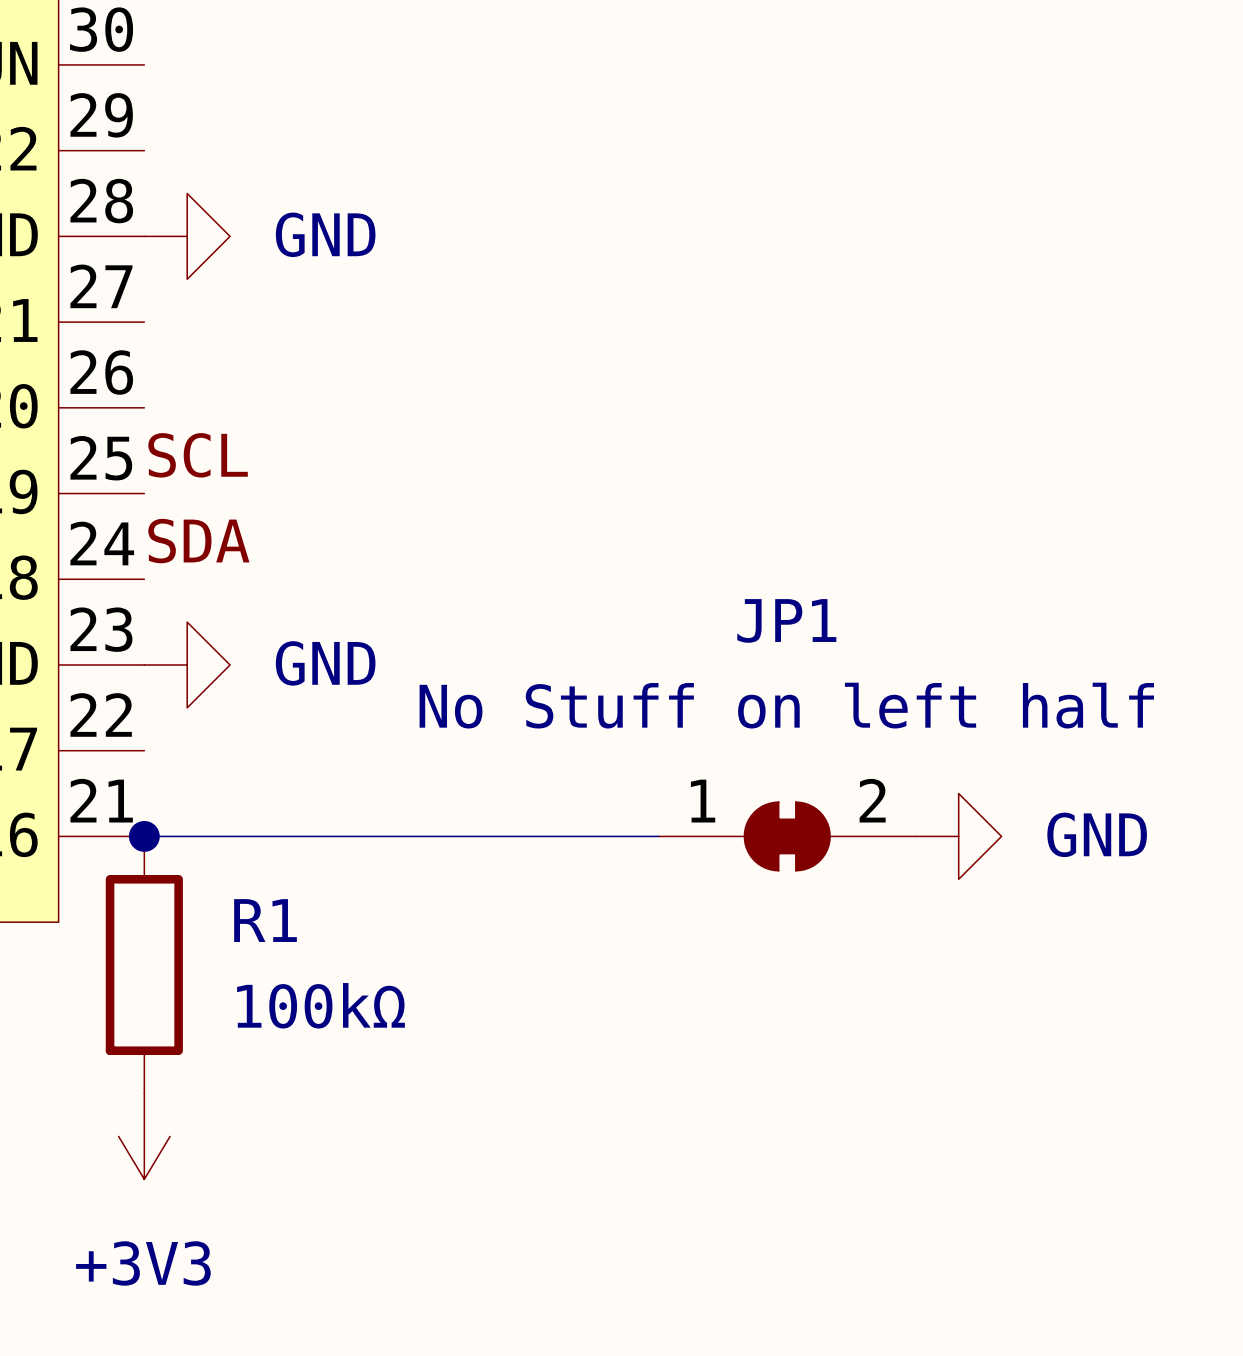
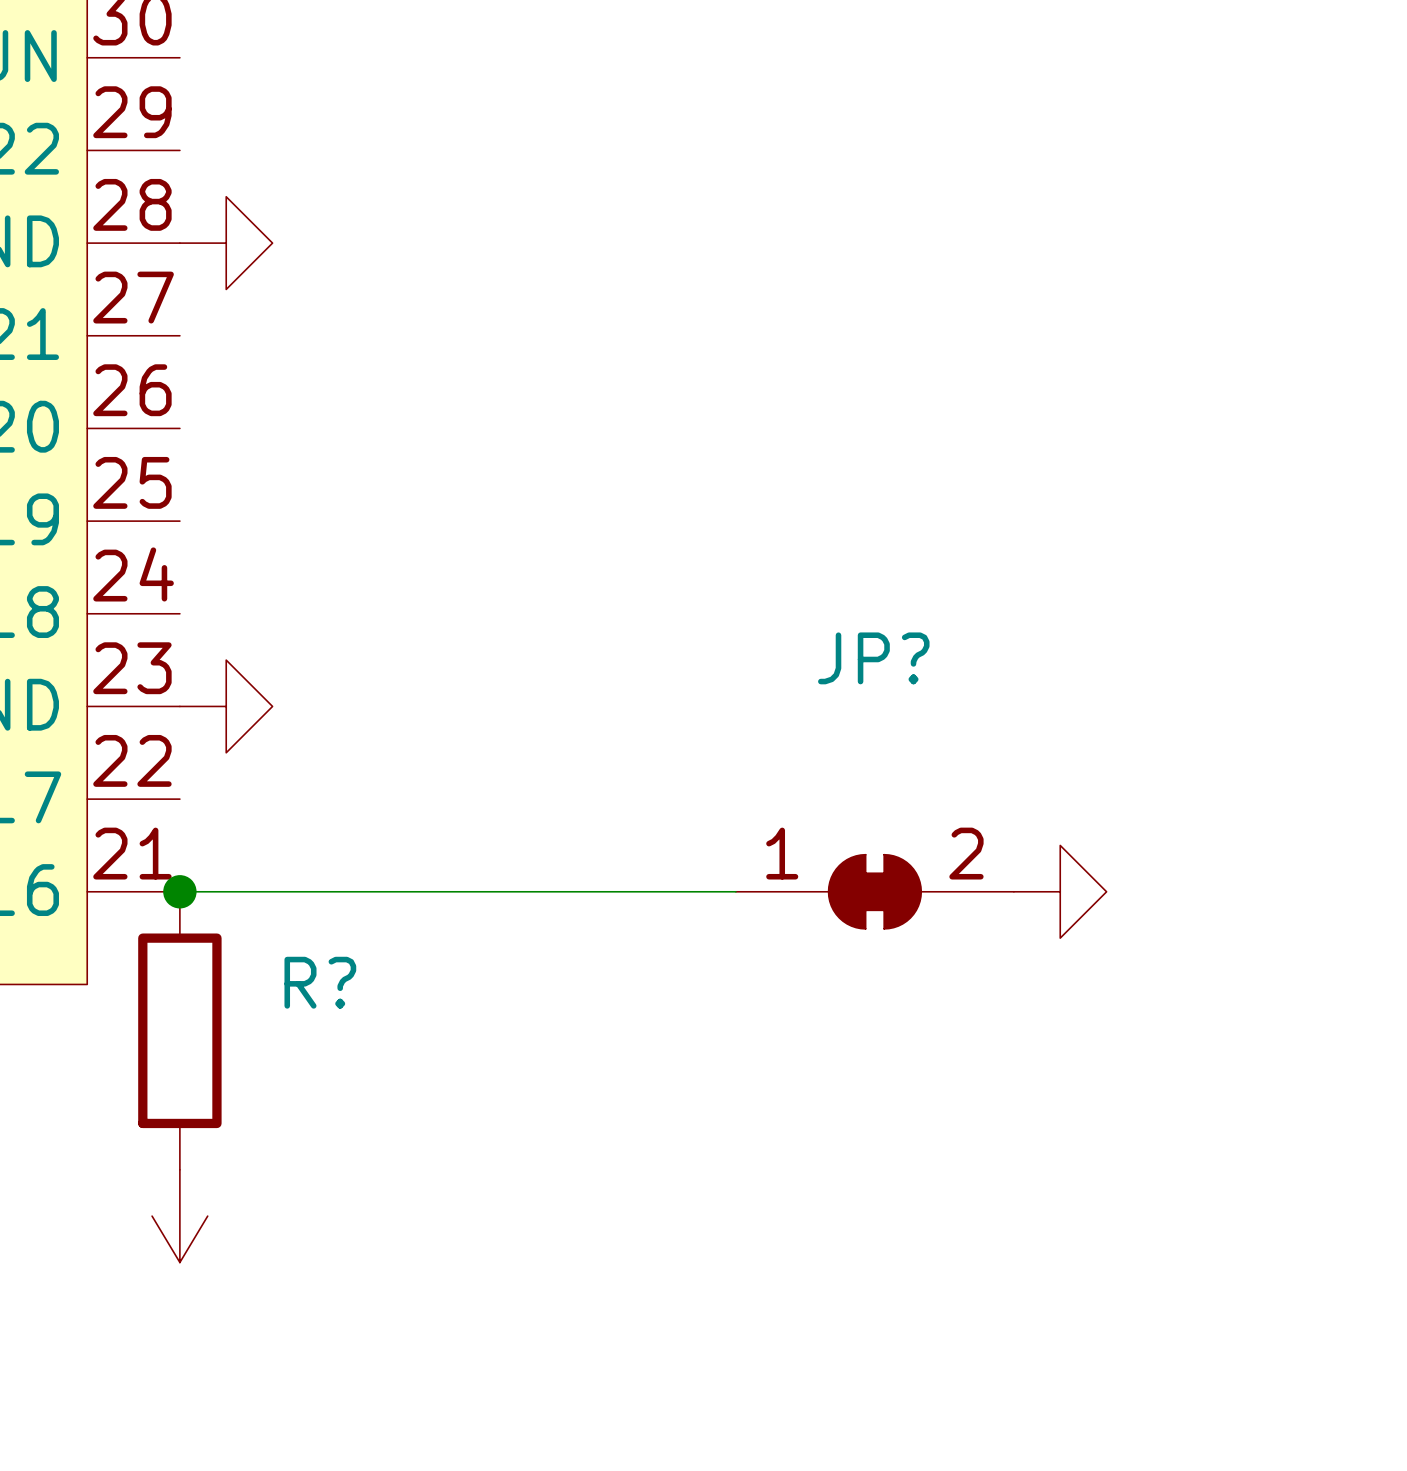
power symbol text: GND (325, 234) -> none
label: SCL (198, 455) -> none
label: SDA (198, 541) -> none
JP1 name: JP1 (786, 620) -> JP? (873, 658)
power symbol text: GND (325, 663) -> none
JP1 value: No Stuff on left half (786, 705) -> none
power symbol text: GND (1097, 834) -> none
R1 name: R1 (265, 920) -> R? (320, 982)
R1 value: 100kΩ (321, 1005) -> none
power symbol text: +3V3 (143, 1263) -> none

